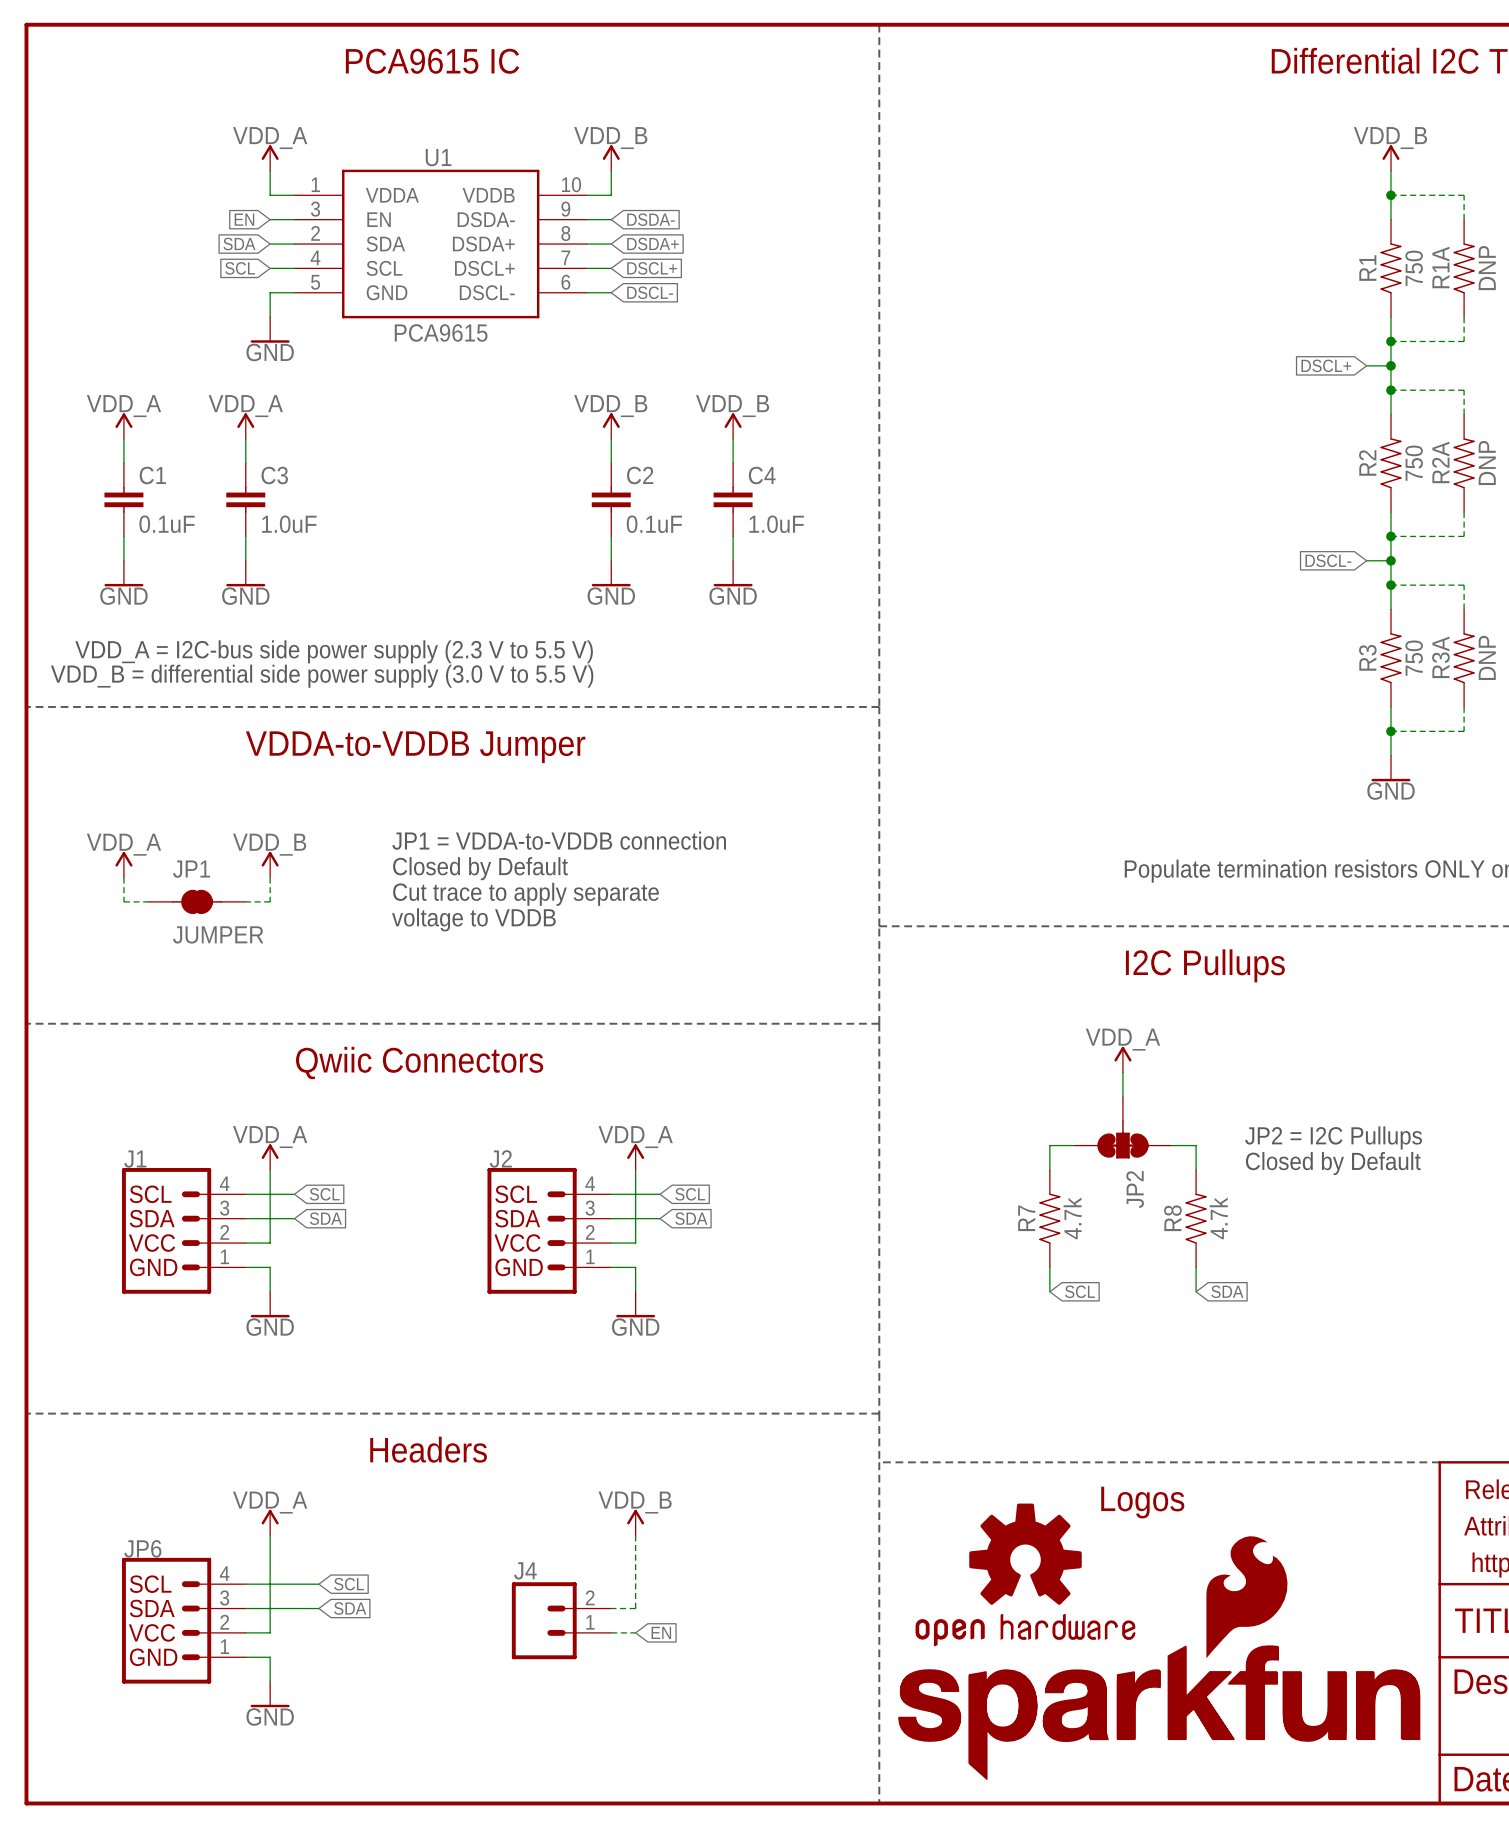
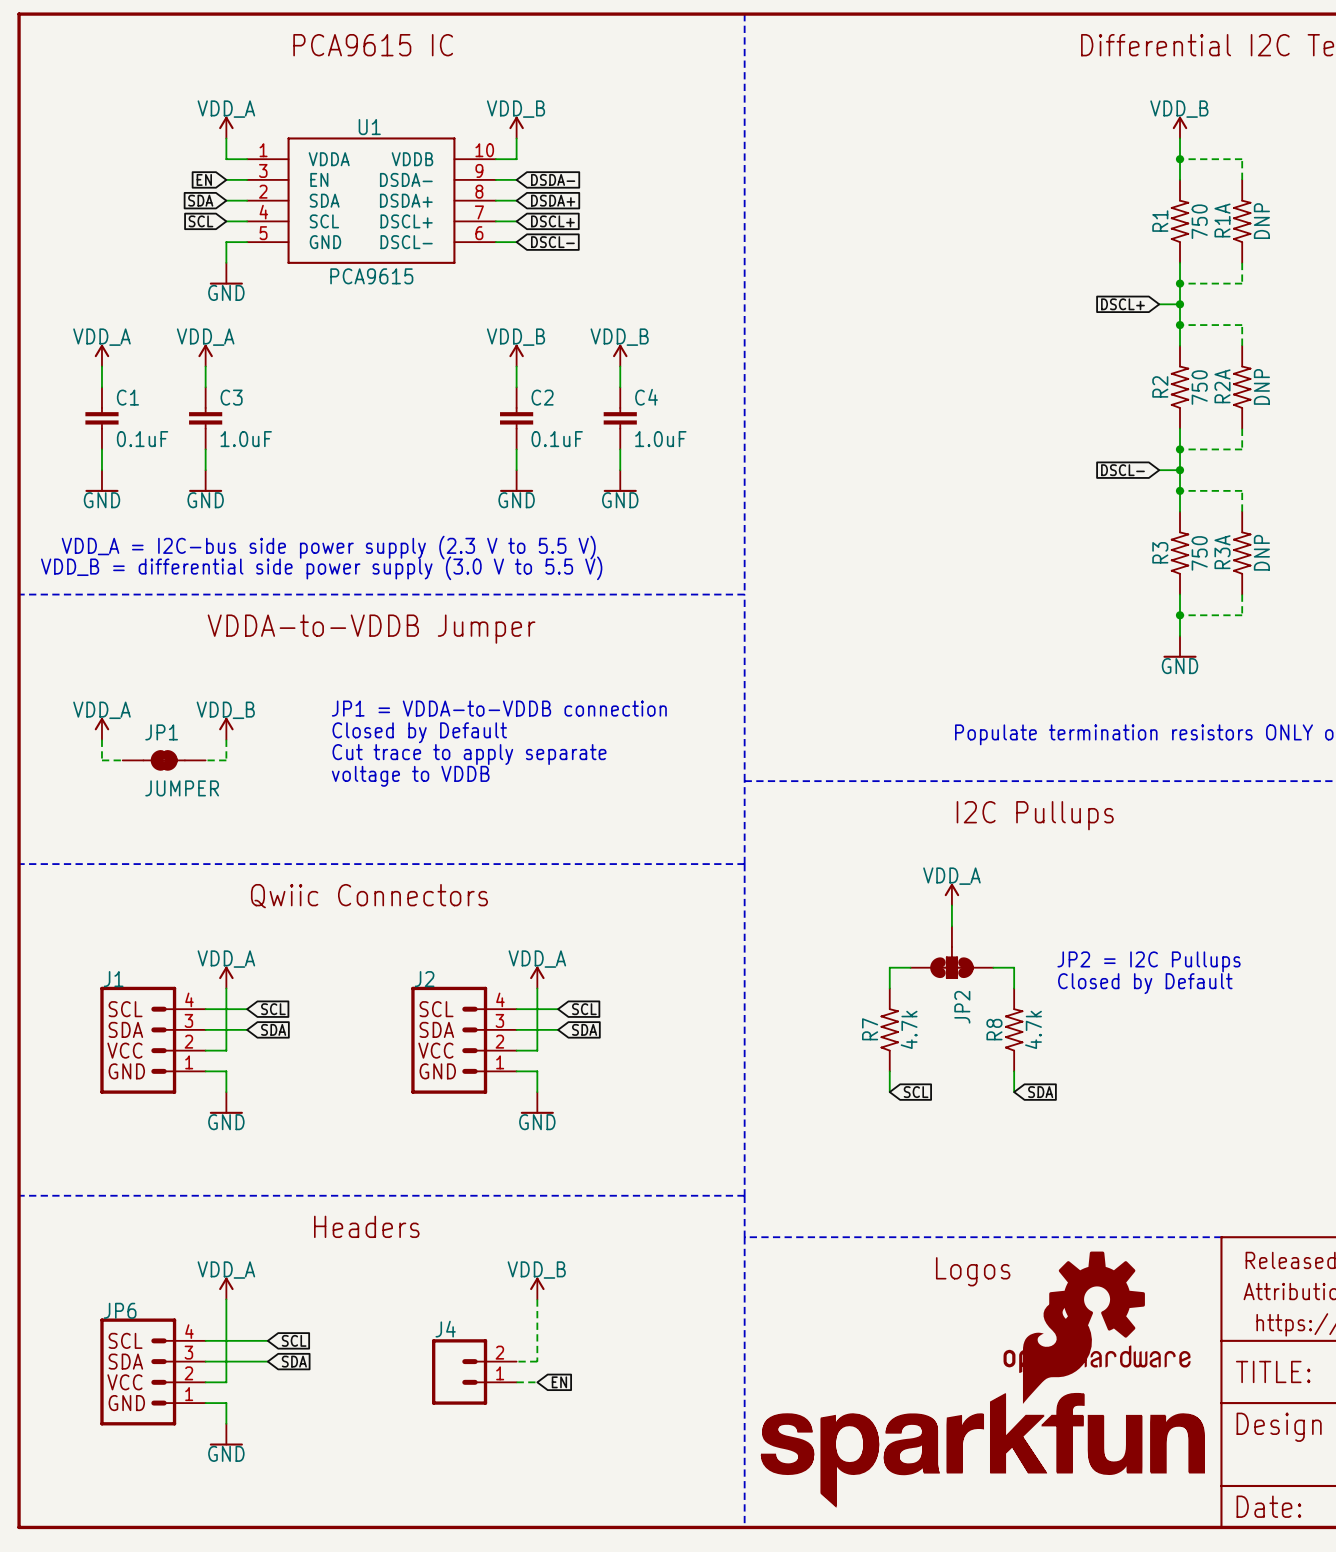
part: none -> (1097, 1312)
part: (1025, 1574) -> none

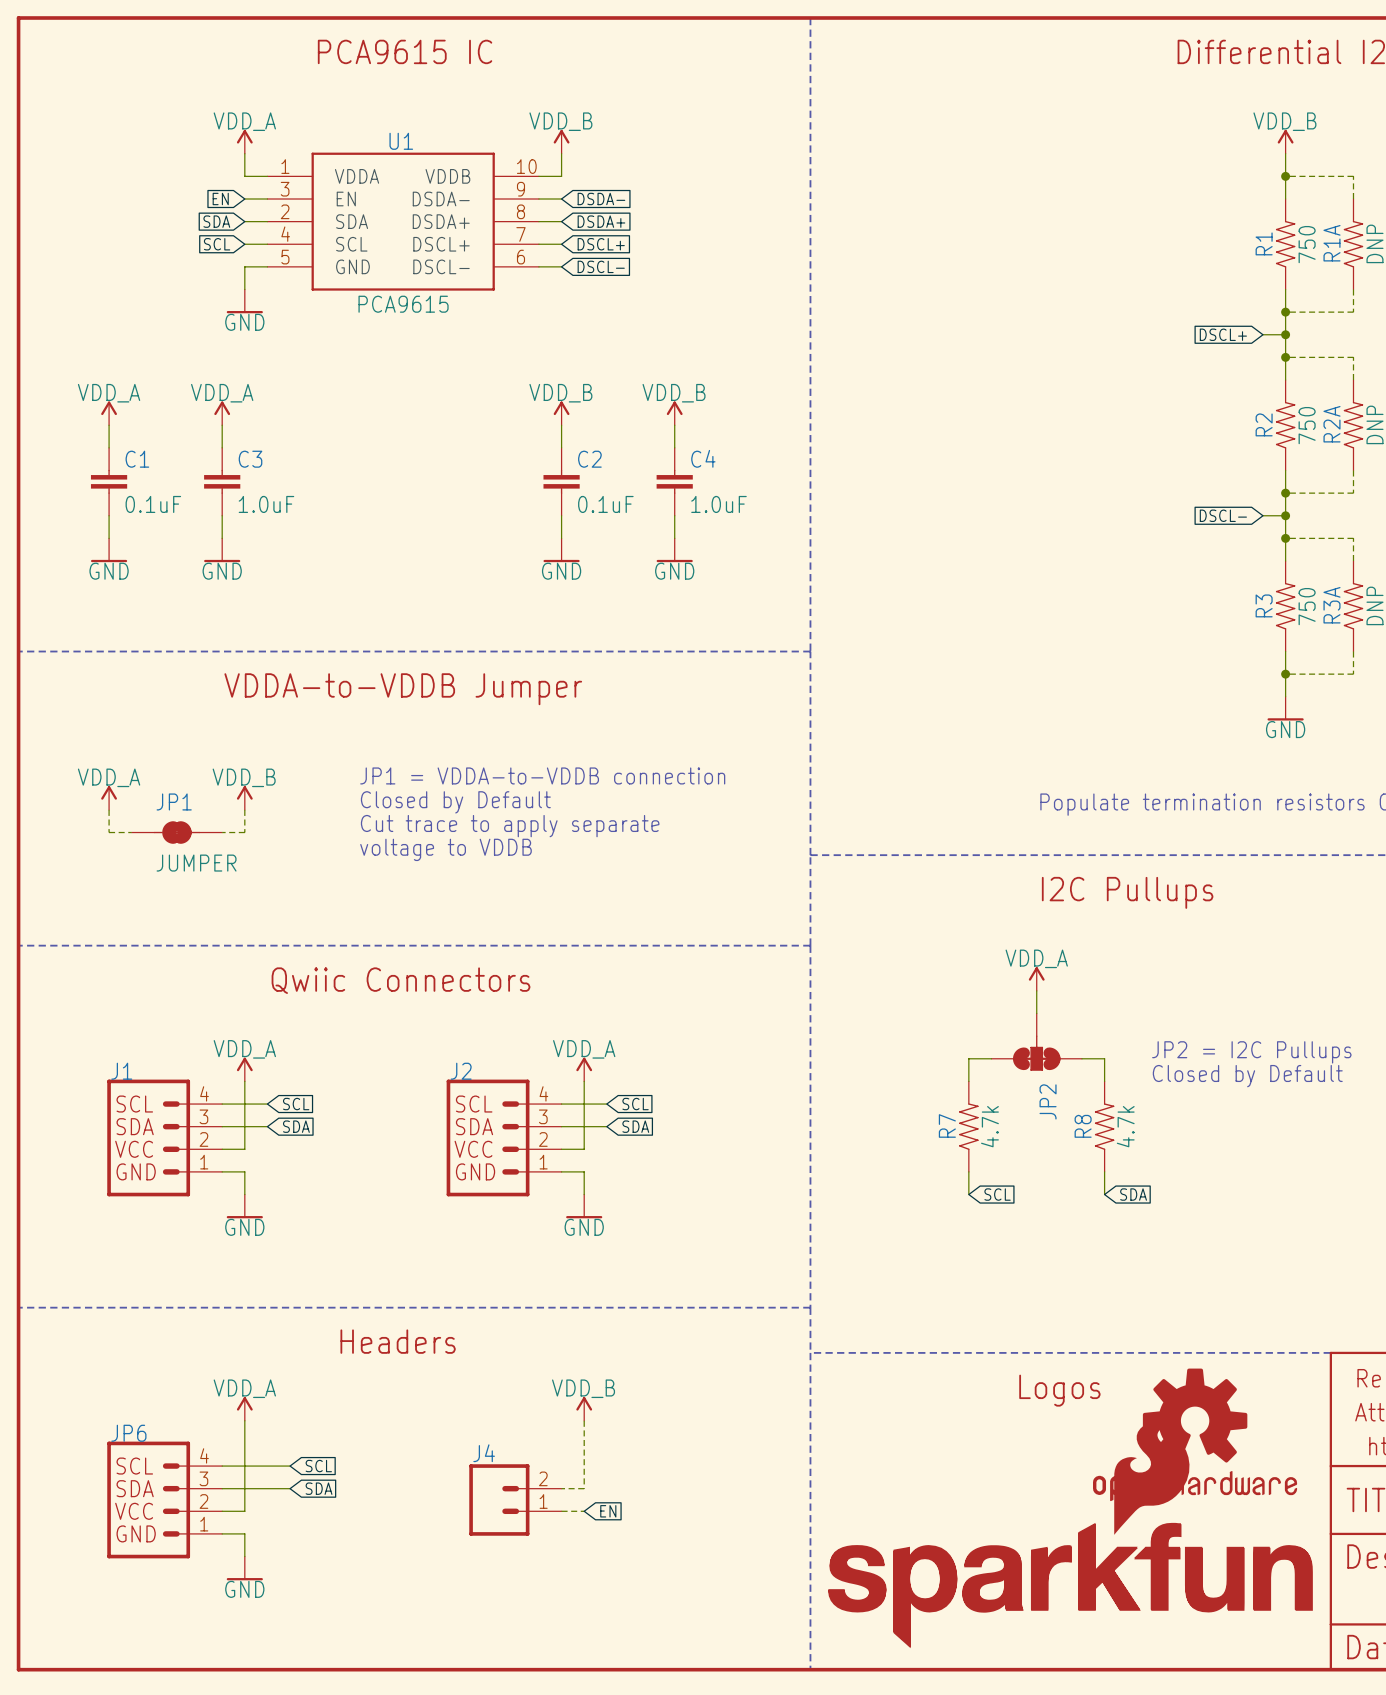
power symbol position: VDD_A (101, 355) -> VDD_A (109, 413)
power symbol position: VDD_A (205, 355) -> VDD_A (222, 413)
power symbol position: VDD_B (516, 355) -> VDD_B (561, 413)
power symbol position: VDD_B (620, 355) -> VDD_B (674, 413)
C1 position: (101, 418) -> (109, 481)
C3 position: (205, 418) -> (222, 481)
C2 position: (516, 418) -> (561, 481)
C4 position: (620, 418) -> (674, 481)
power symbol position: GND (101, 481) -> GND (109, 550)
power symbol position: GND (205, 481) -> GND (222, 550)
power symbol position: GND (516, 481) -> GND (561, 550)
power symbol position: GND (620, 481) -> GND (674, 550)
text: VDD_A = I2C-bus side power supply (2.3 V to 5.5 V) (328, 547) -> none
text: VDD_B = differential side power supply (3.0 V to 5.5 V) (321, 568) -> none

